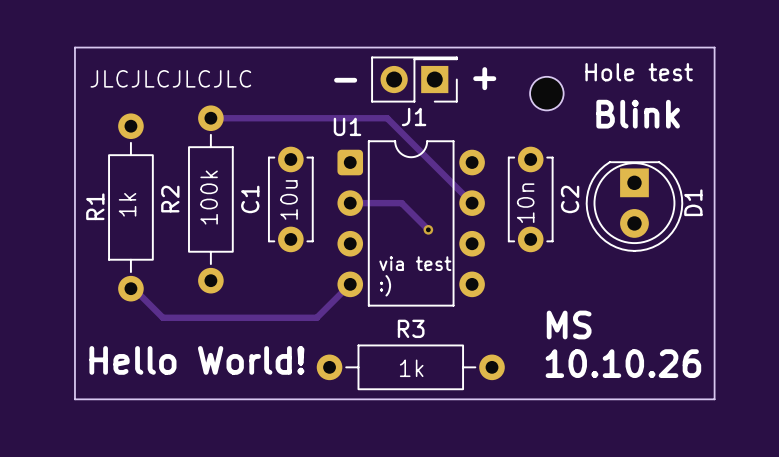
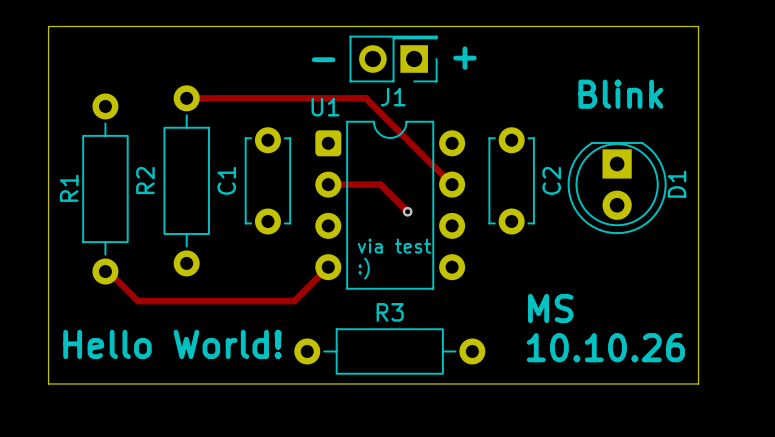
text: JLCJLCJLCJLC (170, 78) -> none
Hole test: (546, 93) -> none
text: 100k (209, 197) -> none
text: 10u (289, 199) -> none
text: 10n (525, 203) -> none
text: 1k (127, 204) -> none
text: 1k (411, 368) -> none

